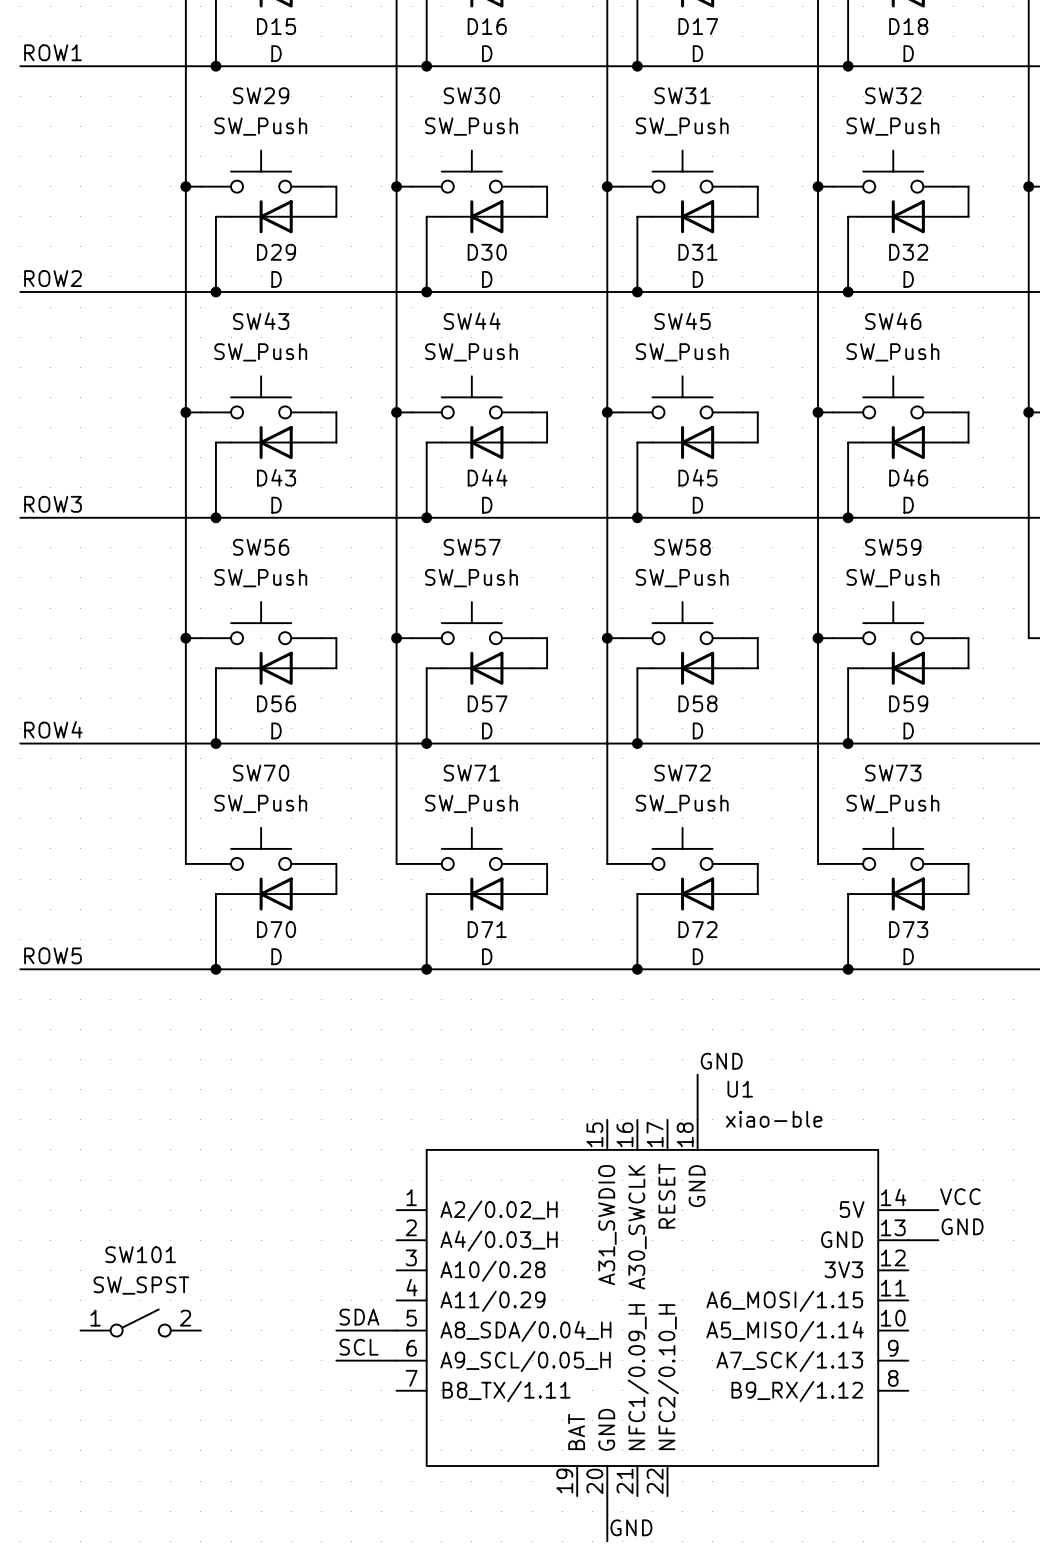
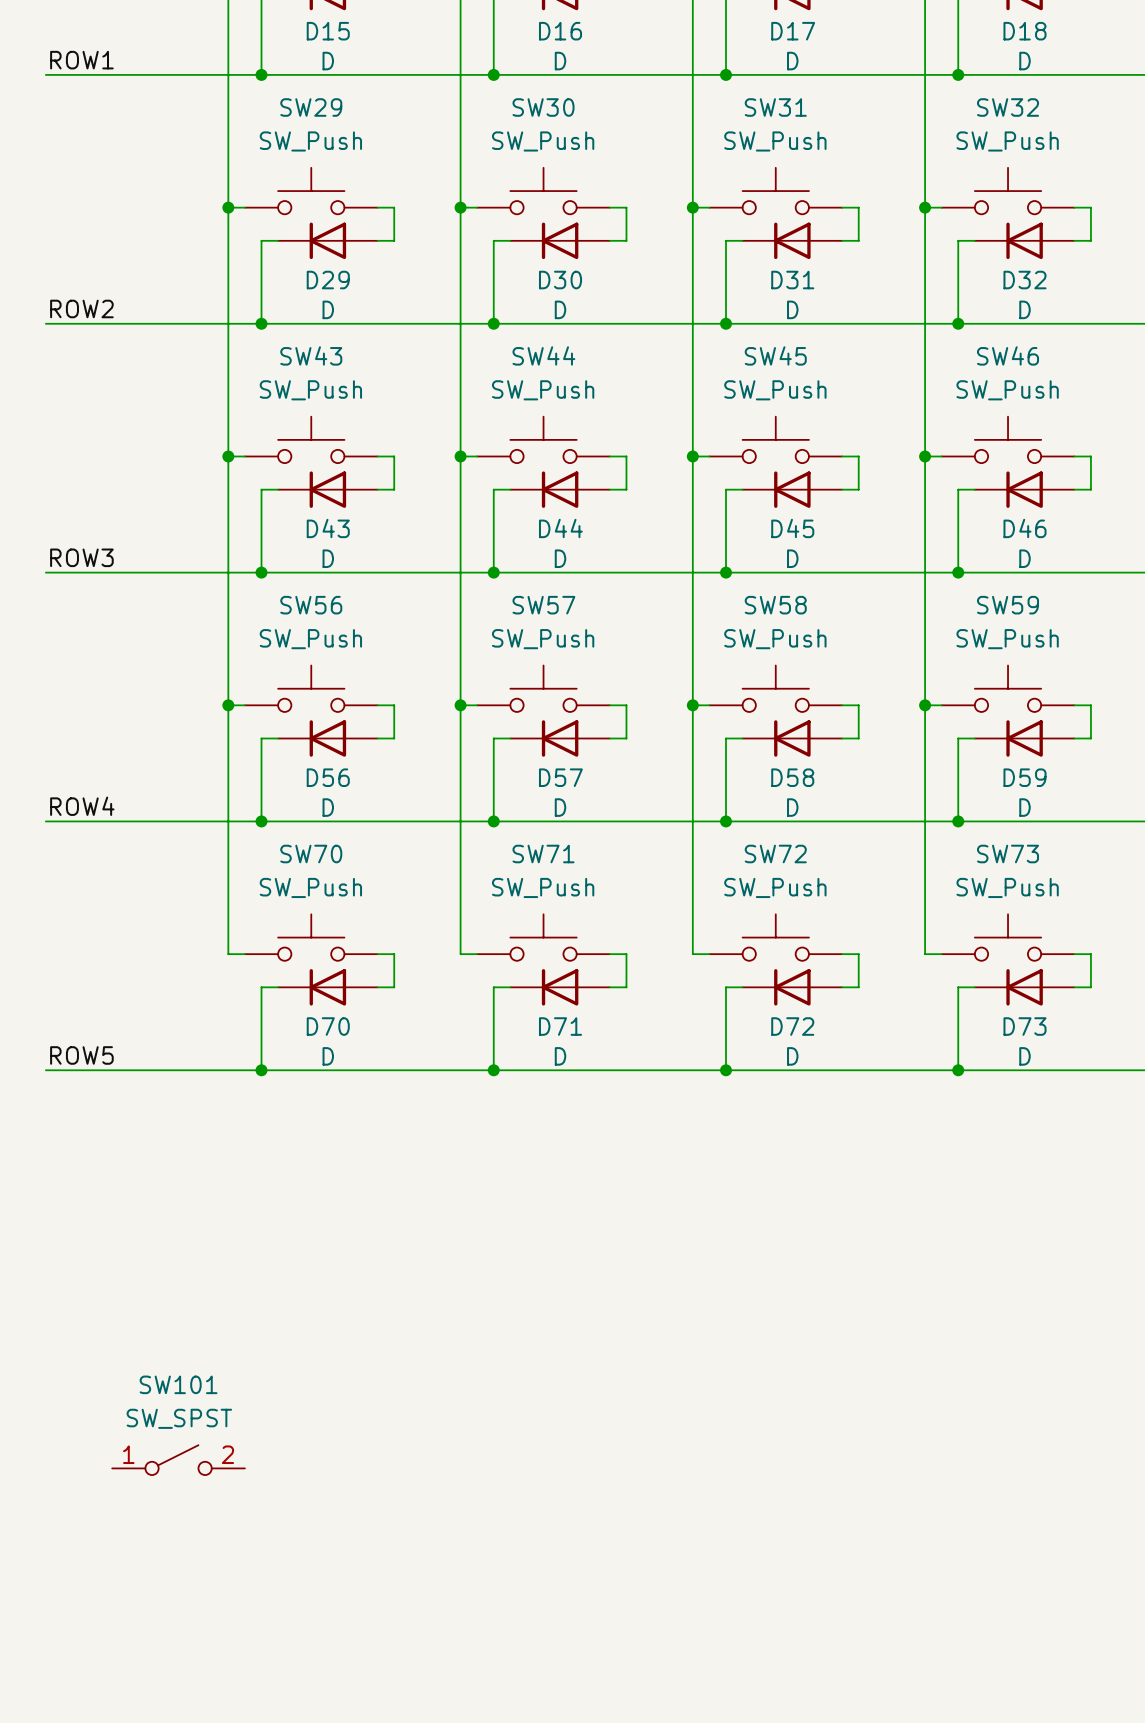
label: GND (721, 1061) -> none
wire: (697, 1074) (697, 1119) -> none
label: VCC (960, 1196) -> none
wire: (908, 1210) (938, 1210) -> none
label: GND (962, 1226) -> none
wire: (908, 1240) (938, 1240) -> none
U1: xiao-ble (652, 1307) -> none
label: SDA (359, 1317) -> none
wire: (336, 1330) (396, 1330) -> none
label: SCL (359, 1347) -> none
wire: (336, 1360) (396, 1360) -> none
wire: (607, 1496) (607, 1541) -> none
label: GND (631, 1527) -> none

